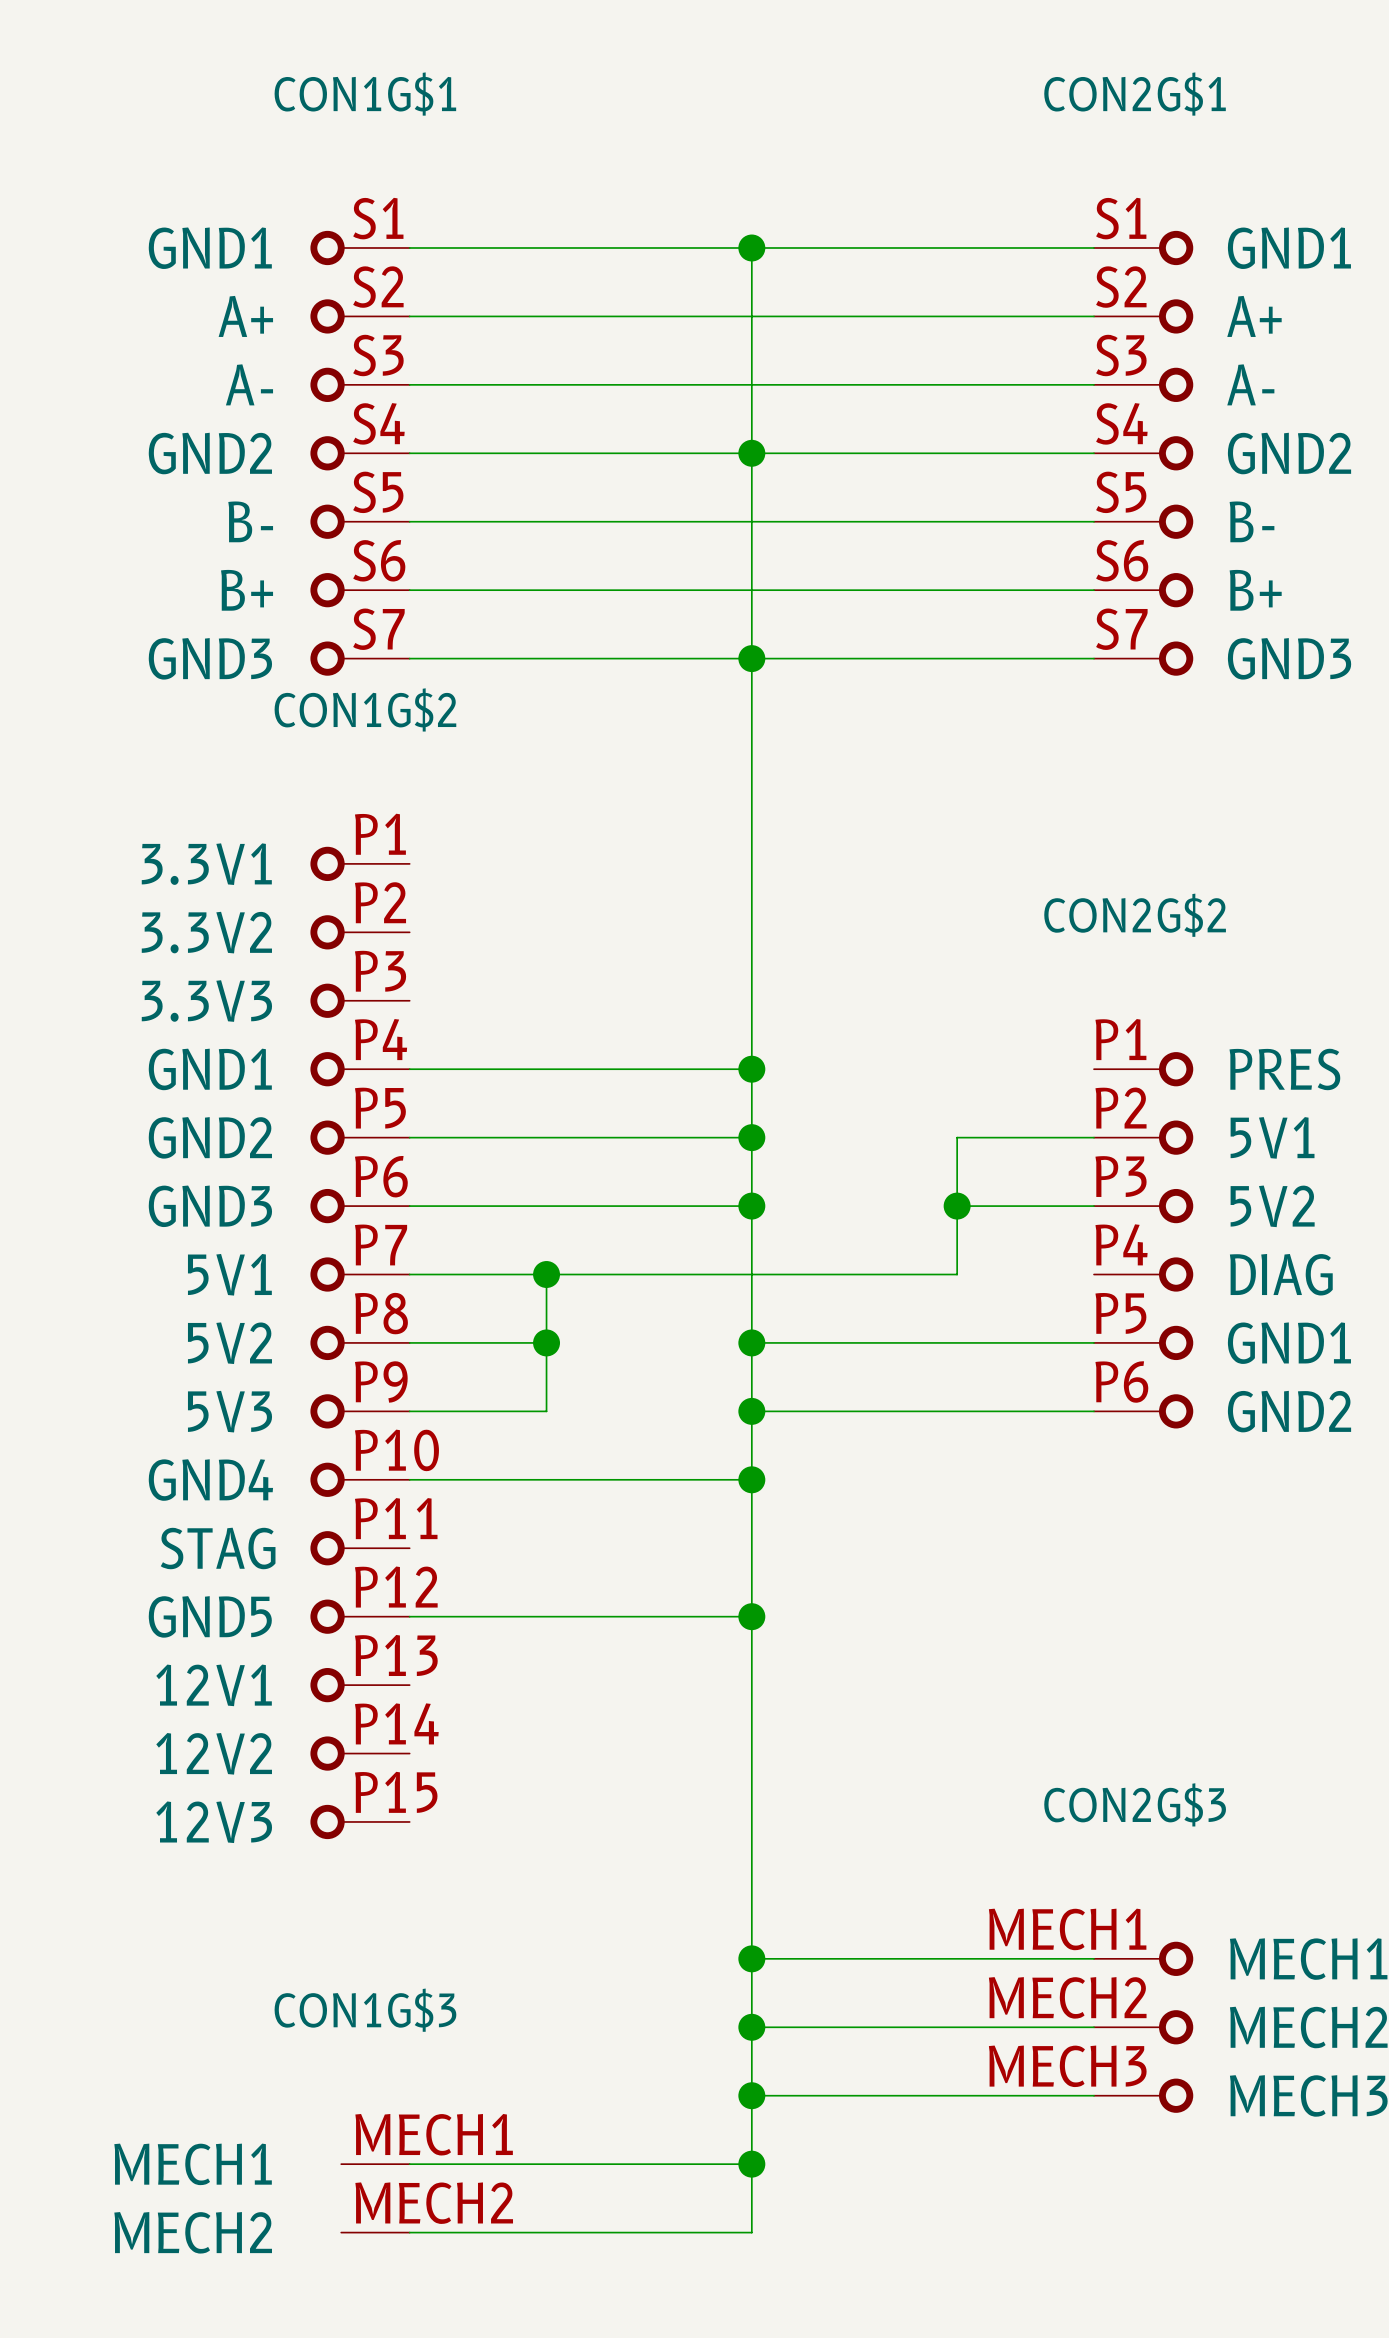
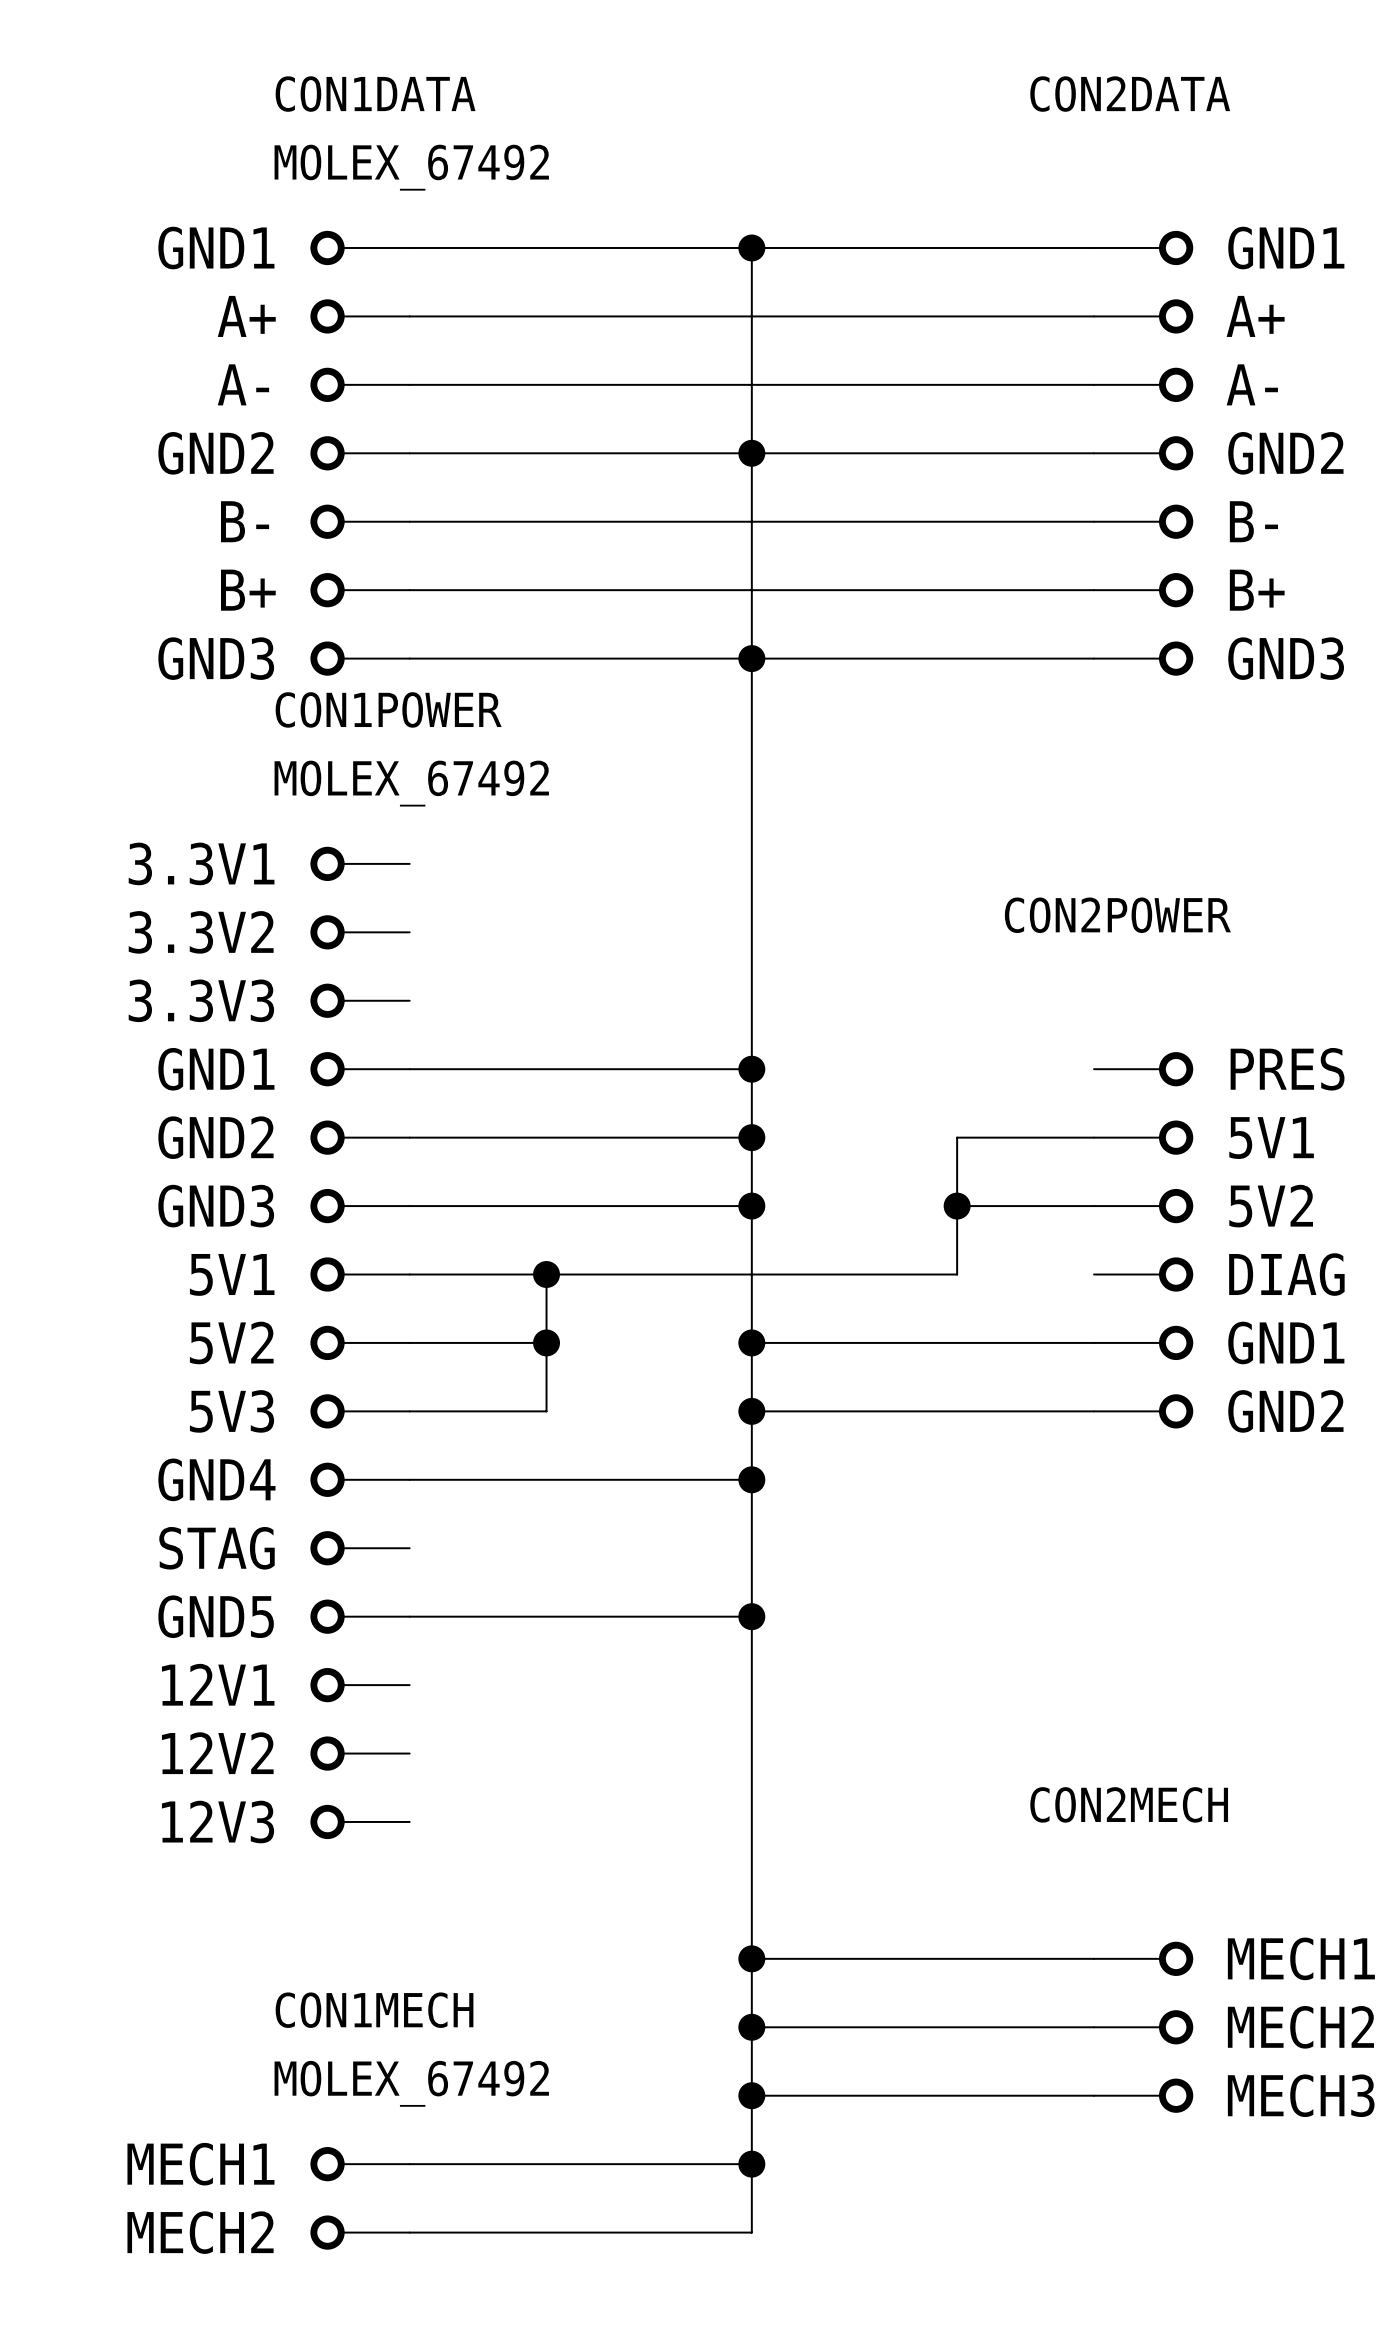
CON1G$1 name: CON1G$1 (365, 94) -> CON1DATA (375, 94)
CON2G$1 name: CON2G$1 (1135, 94) -> CON2DATA (1130, 94)
CON1G$1 value: none -> MOLEX_67492 (411, 167)
CON1G$1 pin number: S1 (378, 218) -> none
CON2G$1 pin number: S1 (1121, 218) -> none
CON1G$1 pin number: S2 (378, 287) -> none
CON2G$1 pin number: S2 (1121, 287) -> none
CON1G$1 pin number: S3 (378, 355) -> none
CON2G$1 pin number: S3 (1121, 355) -> none
CON1G$1 pin number: S4 (378, 423) -> none
CON2G$1 pin number: S4 (1121, 423) -> none
CON1G$1 pin number: S5 (378, 492) -> none
CON2G$1 pin number: S5 (1121, 492) -> none
CON1G$1 pin number: S6 (379, 560) -> none
CON2G$1 pin number: S6 (1122, 560) -> none
CON1G$1 pin number: S7 (378, 629) -> none
CON2G$1 pin number: S7 (1121, 629) -> none
CON1G$2 name: CON1G$2 (365, 709) -> CON1POWER (388, 709)
CON1G$2 value: none -> MOLEX_67492 (411, 783)
CON1G$2 symbol: [310, 846, 410, 1840] -> [310, 846, 410, 1840]
CON2G$2 name: CON2G$2 (1135, 915) -> CON2POWER (1117, 915)
CON2G$2 pin number: P1 (1120, 1039) -> none
CON2G$2 pin number: P2 (1120, 1108) -> none
CON2G$2 pin number: P3 (1121, 1176) -> none
CON2G$2 pin number: P4 (1121, 1244) -> none
CON2G$2 pin number: P5 (1120, 1313) -> none
CON2G$2 pin number: P6 (1121, 1382) -> none
CON2G$3 name: CON2G$3 (1135, 1804) -> CON2MECH (1129, 1804)
CON2G$3 pin number: MECH1 (1067, 1929) -> none
CON2G$3 pin number: MECH2 (1067, 1997) -> none
CON2G$3 pin number: MECH3 (1067, 2066) -> none
CON1MECH: none -> MOLEX_67492 (360, 2198)
CON1G$3: (375, 2198) -> none

